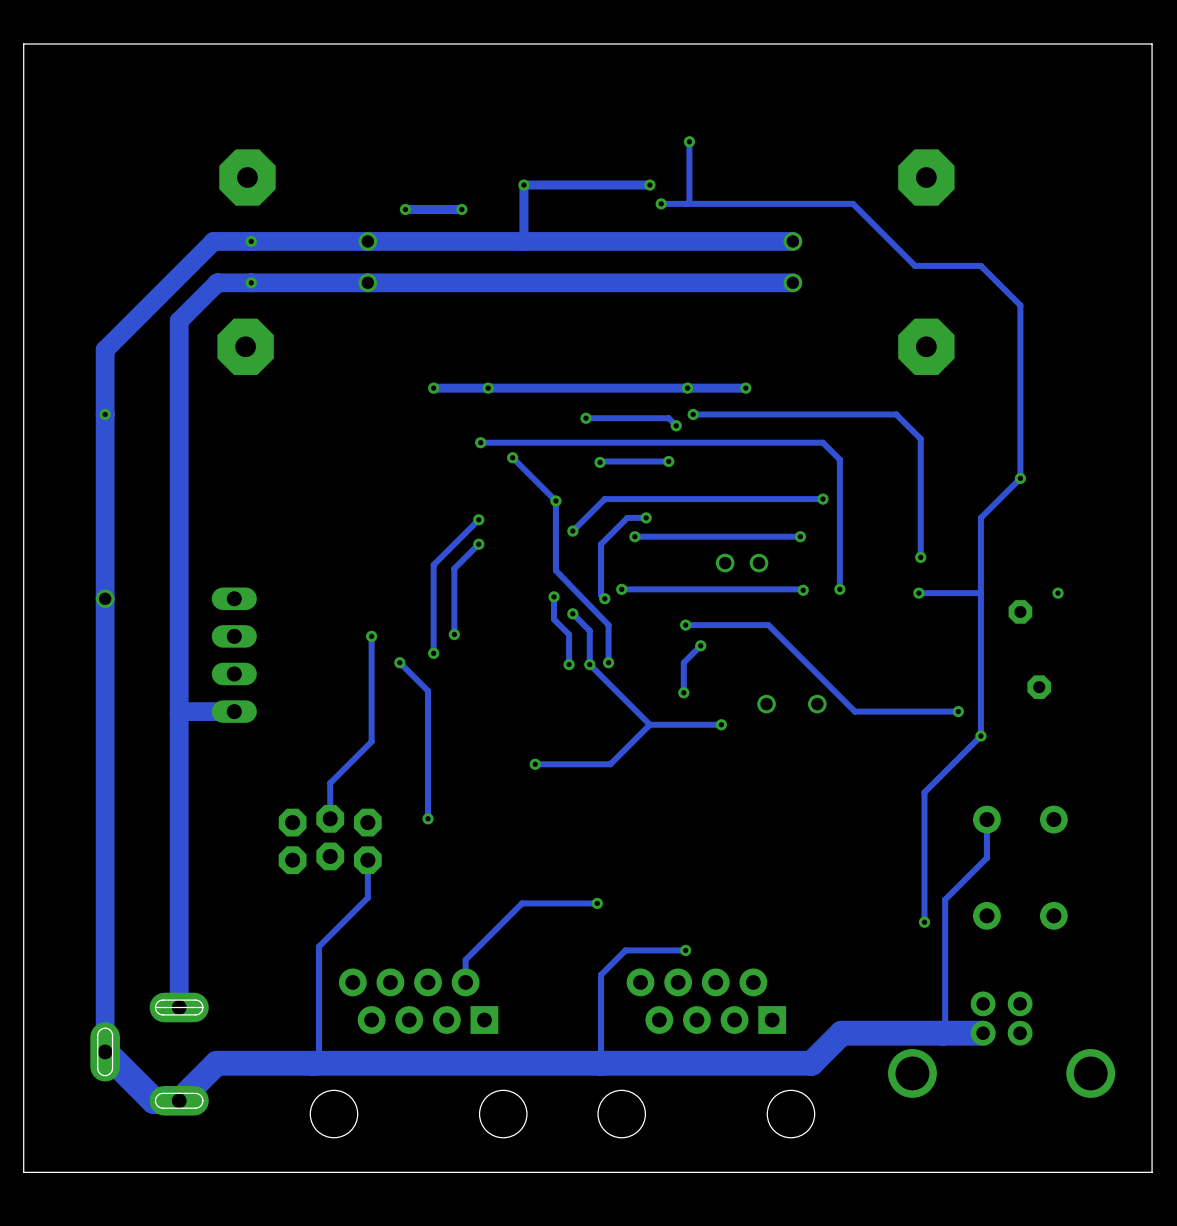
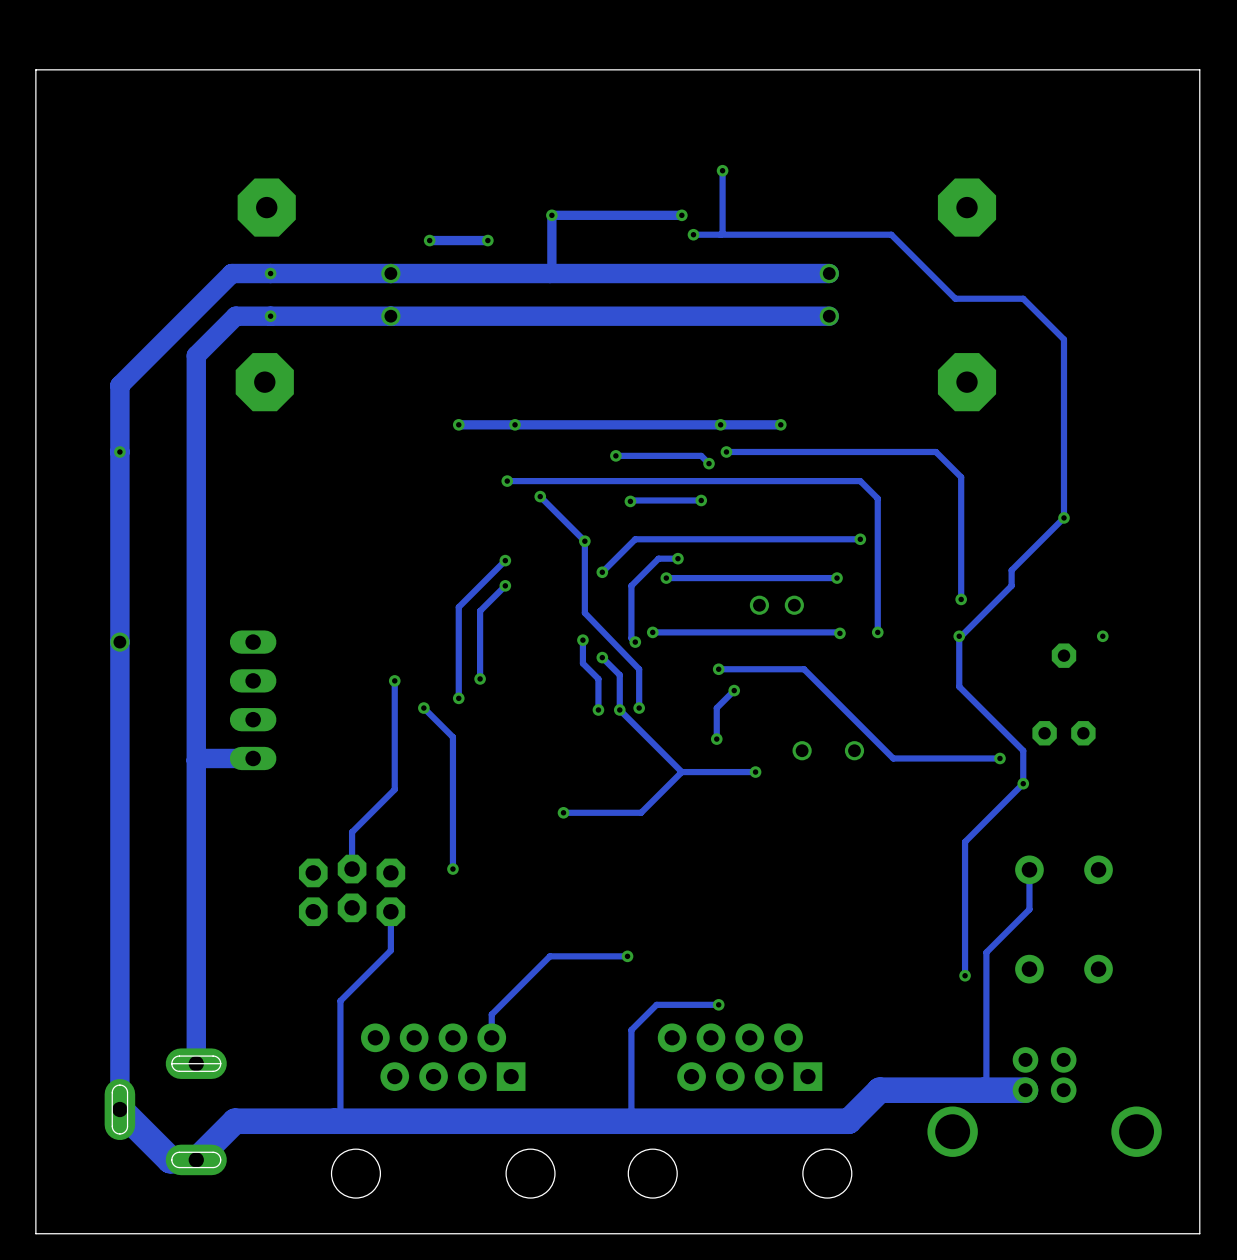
track: (980, 517) (980, 704) -> (959, 636) (959, 686) (1023, 750)
track: (980, 593) (920, 593) -> (1023, 558) (1011, 570) (1011, 585) (961, 636)
part: none -> (1044, 733)

